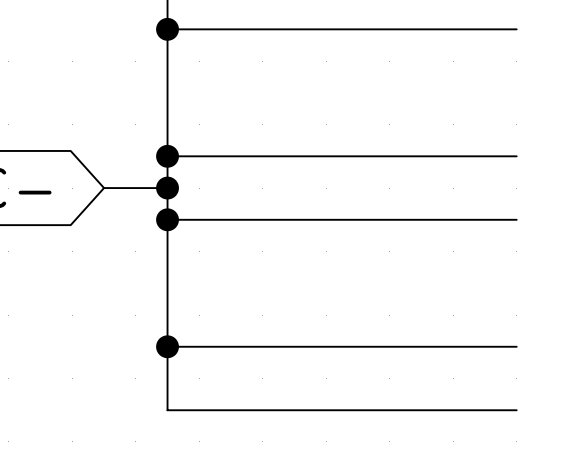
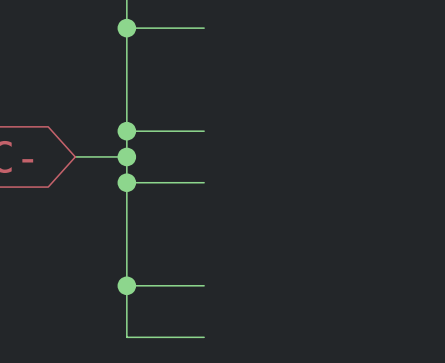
wire: (262, 29) (516, 29) -> none
wire: (262, 156) (516, 156) -> none
wire: (262, 219) (516, 219) -> none
wire: (262, 346) (516, 346) -> none
wire: (262, 410) (516, 410) -> none

